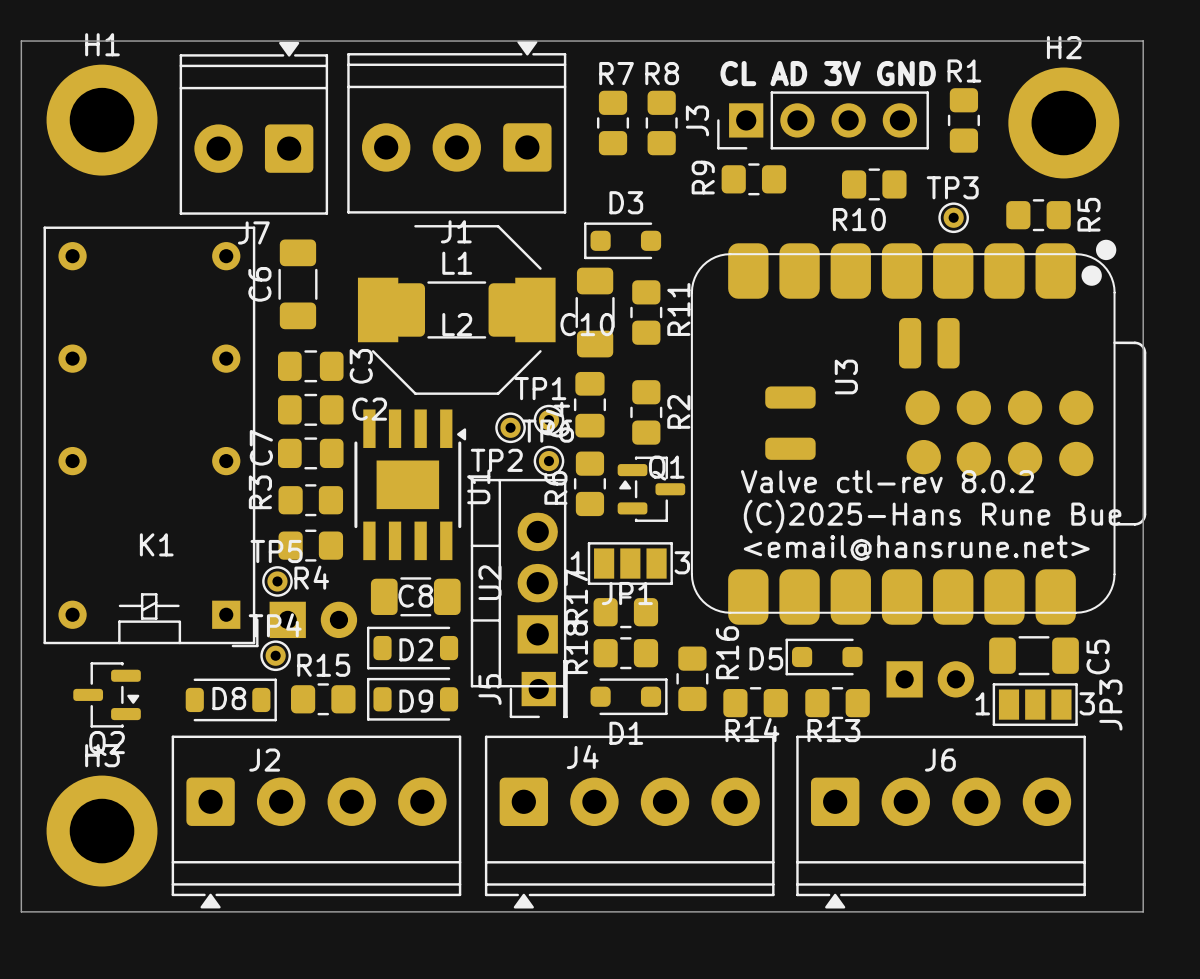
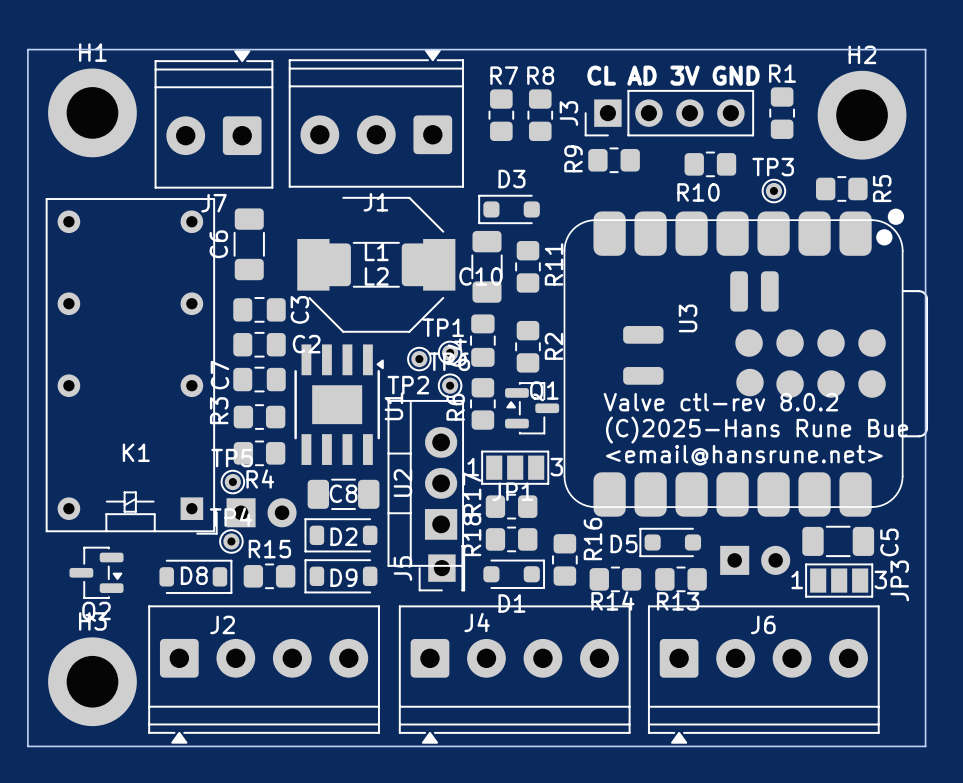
L1 name position: L1 (457, 263) -> L1 (376, 251)

